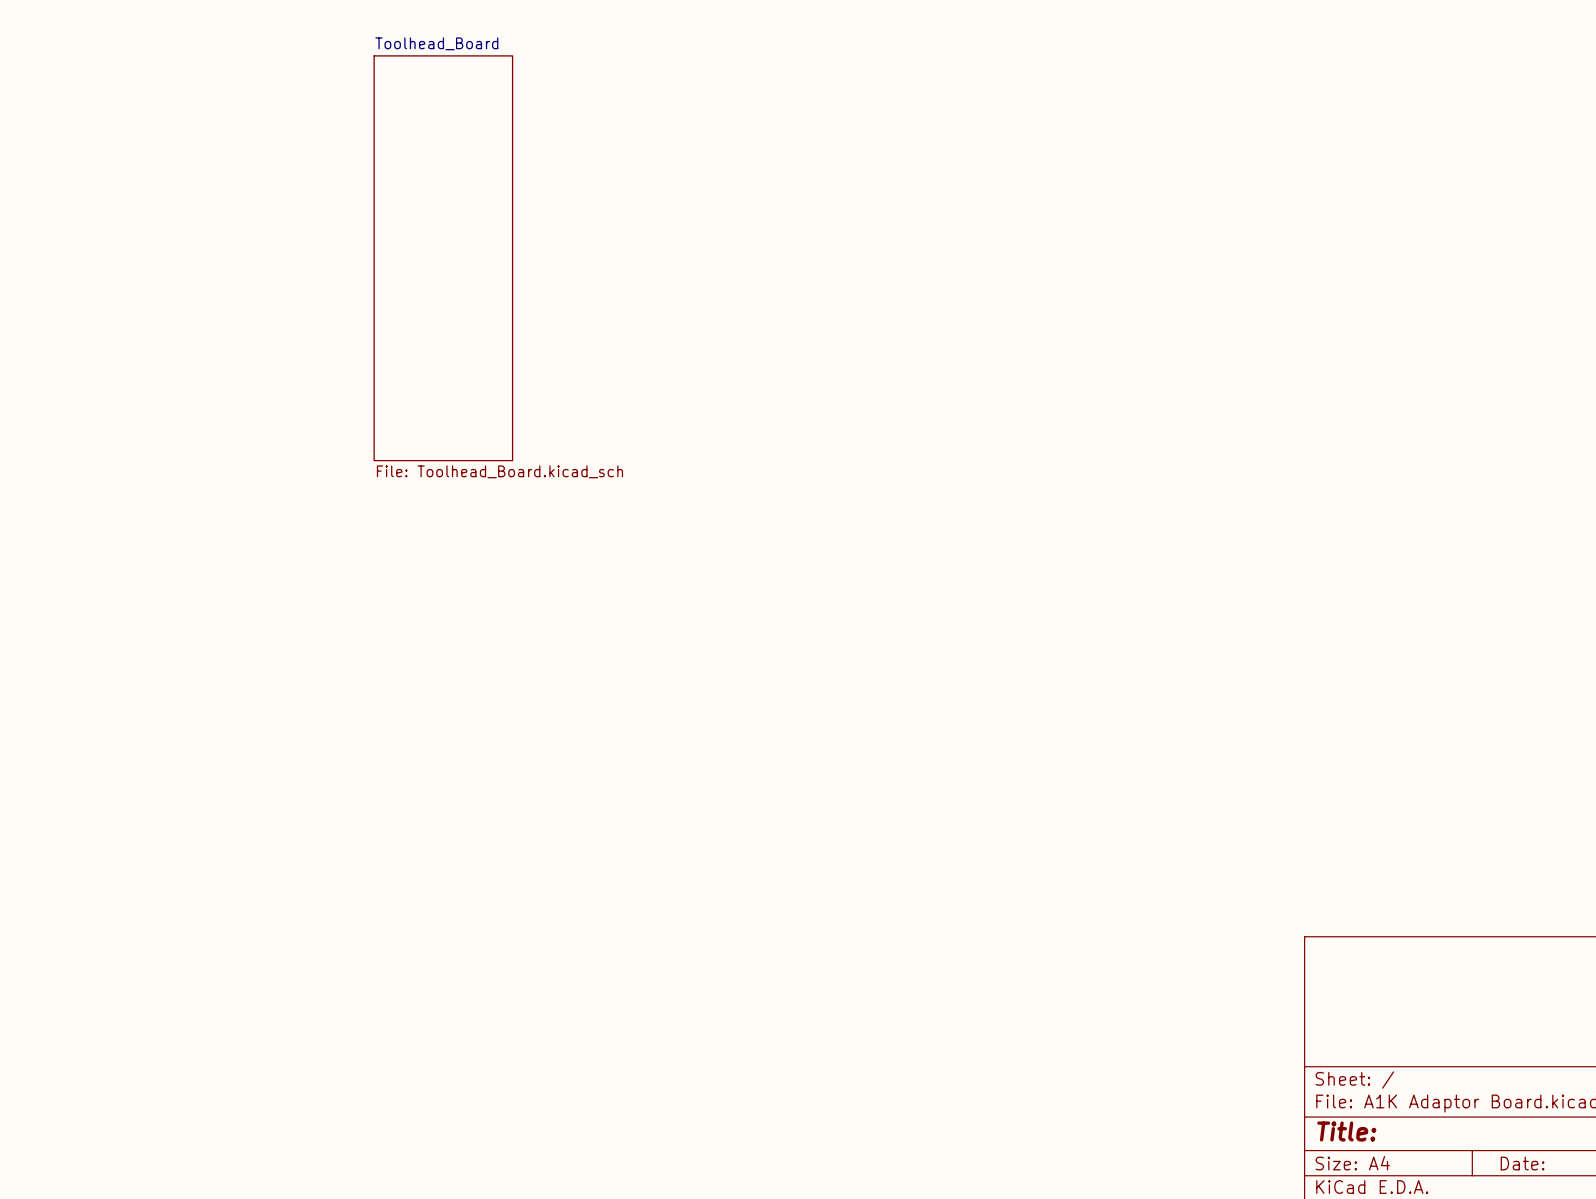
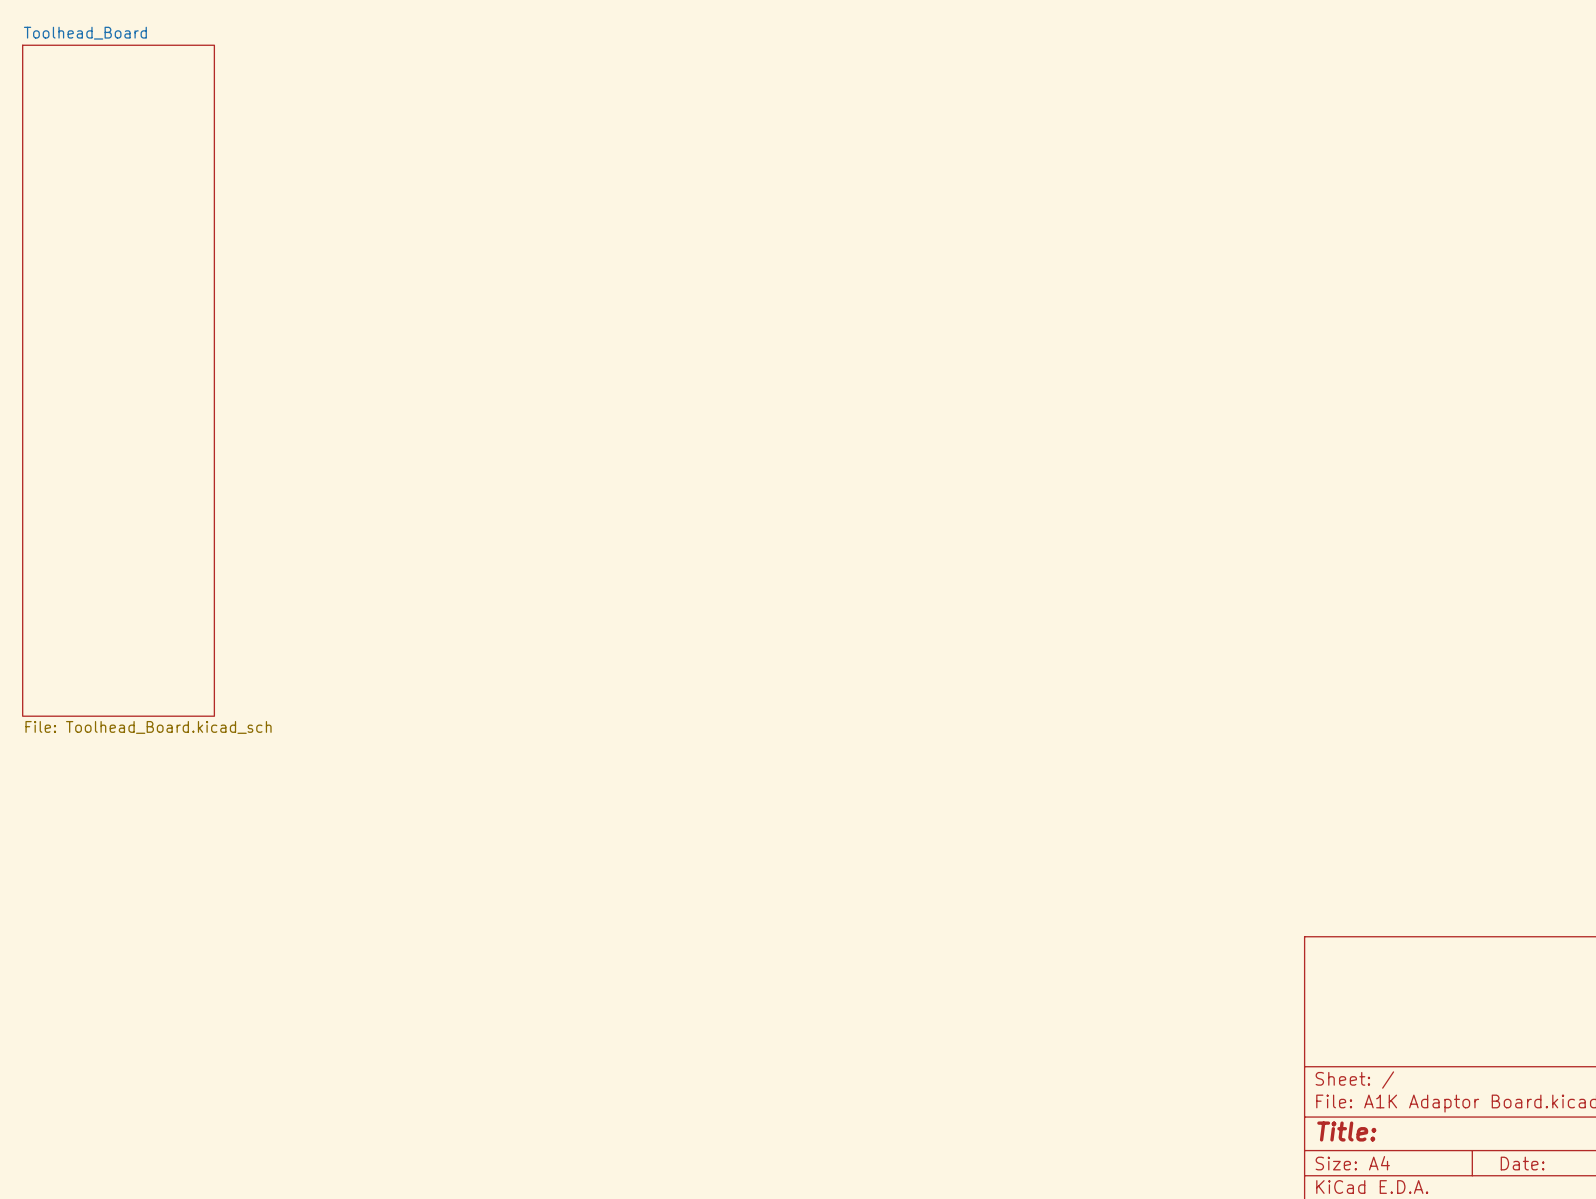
sheet Toolhead_Board: File: Toolhead_Board.kicad_sch (443, 258) -> none
sheet Toolhead_Board: none -> File: Toolhead_Board.kicad_sch (118, 380)

